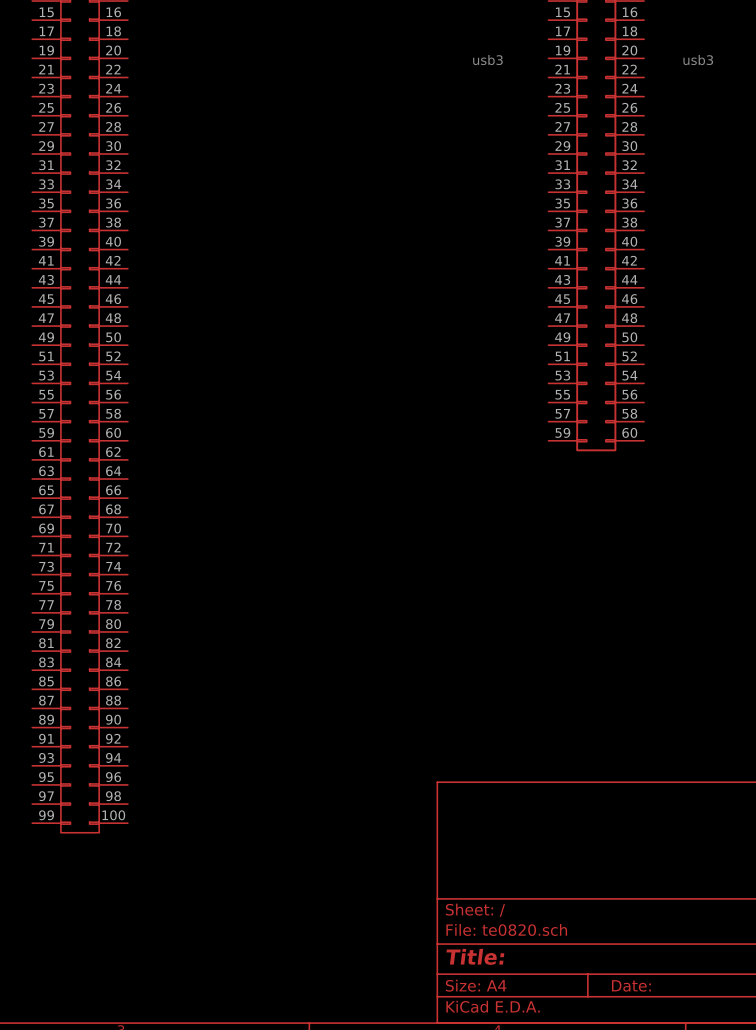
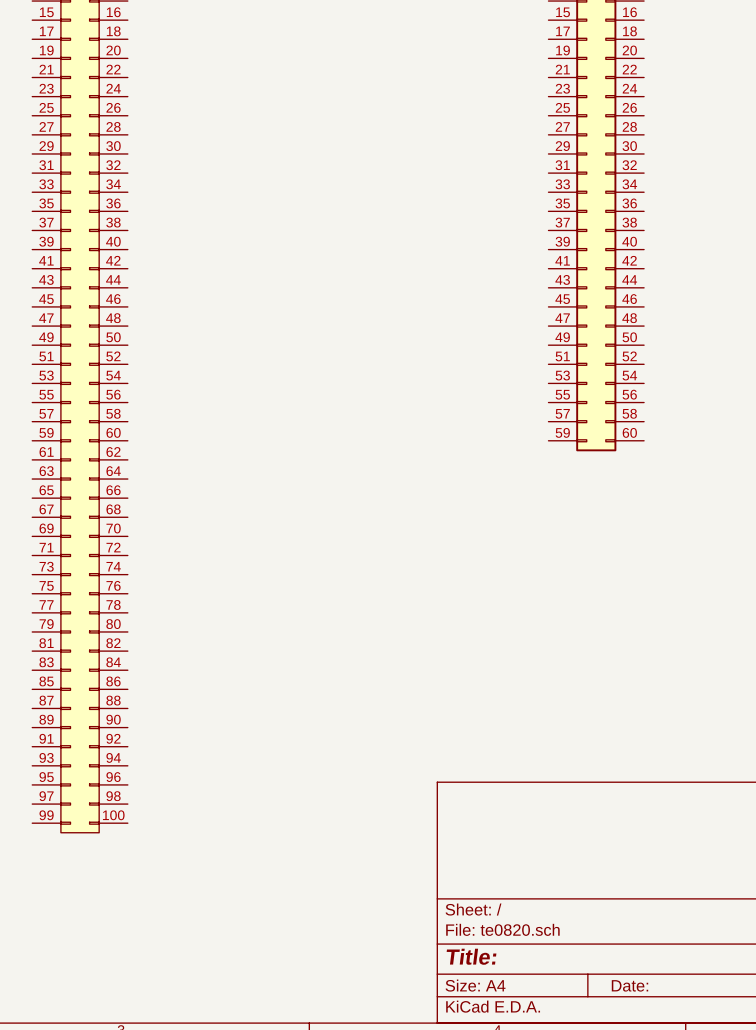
text: usb3 (487, 60) -> none
text: usb3 (698, 60) -> none

